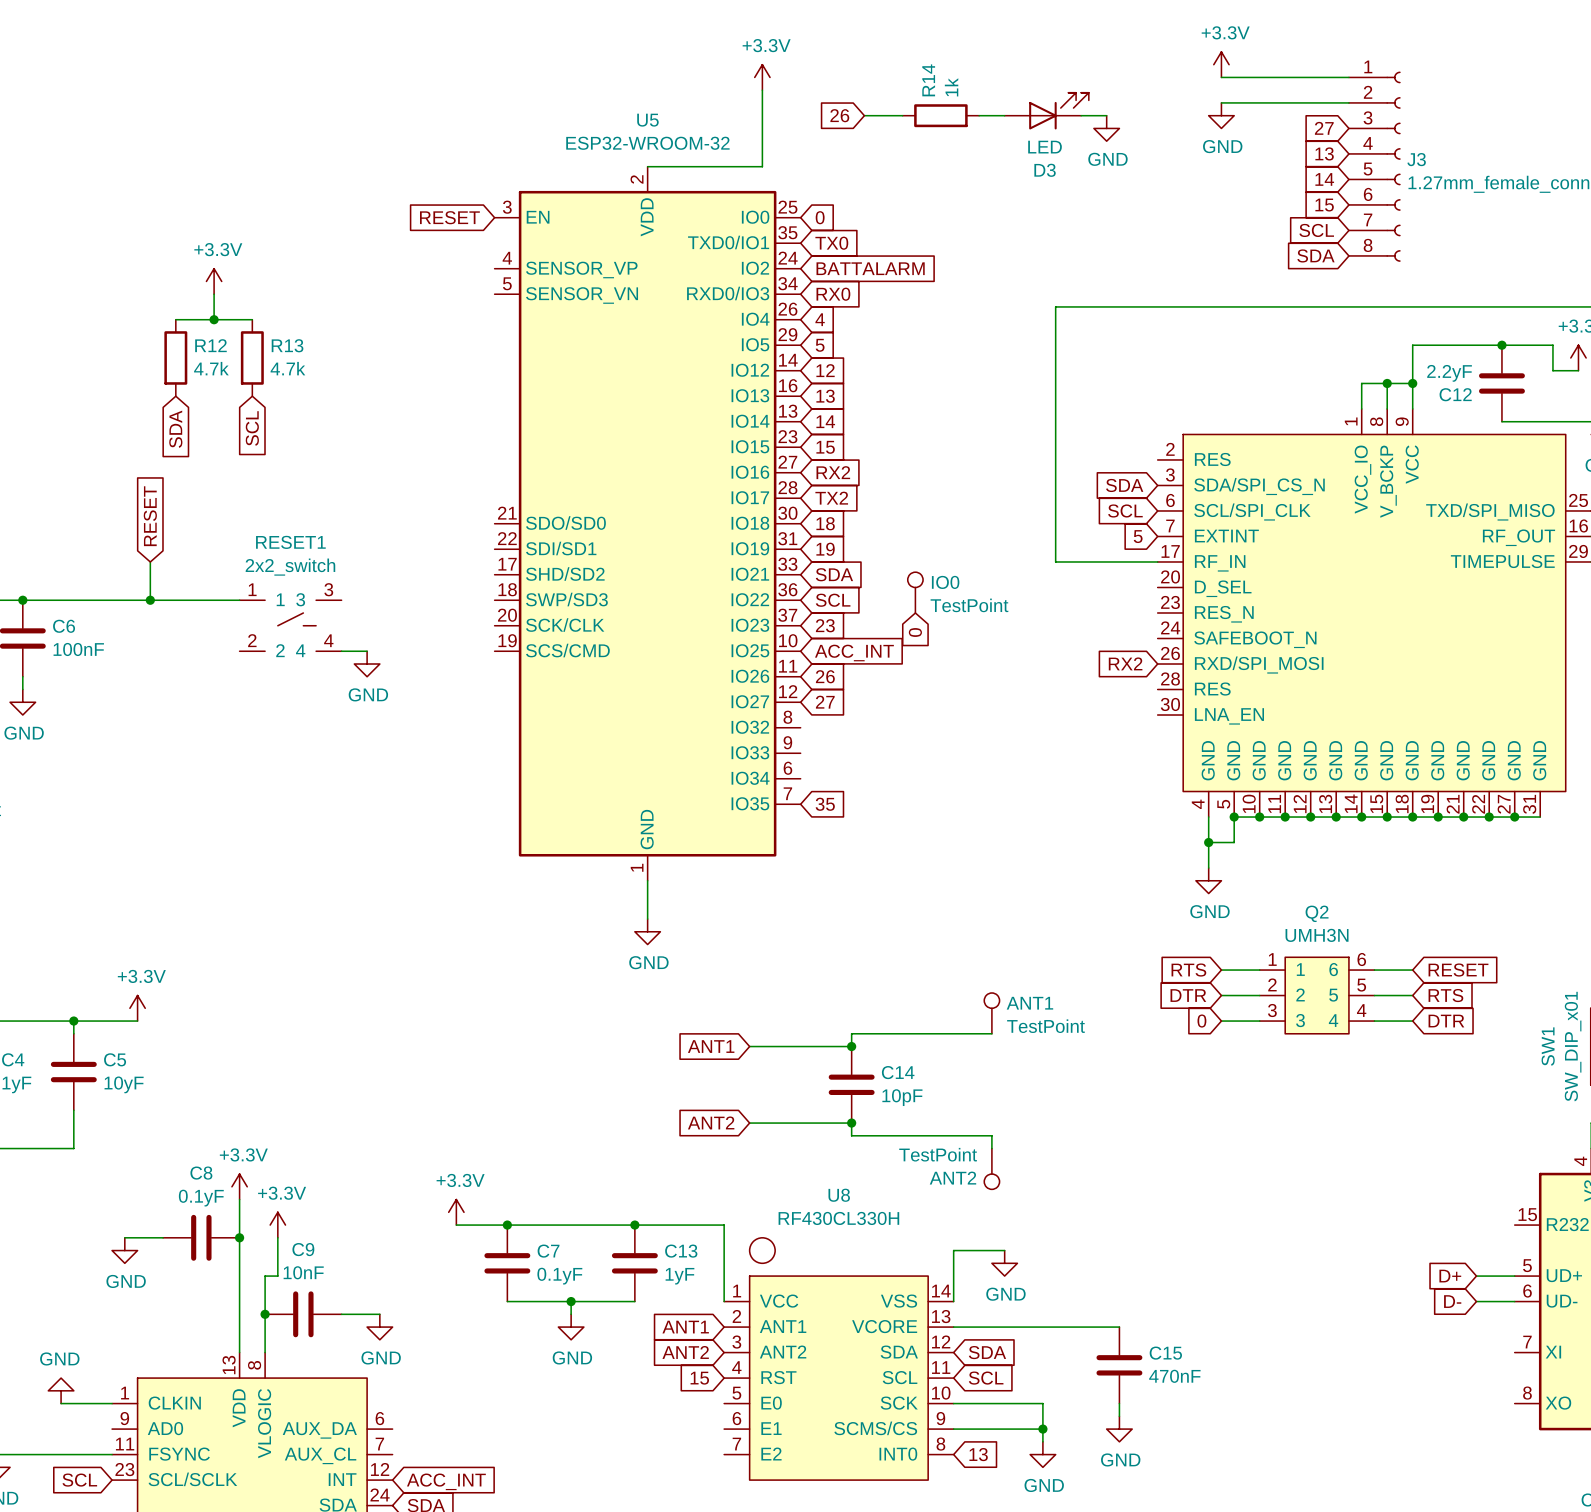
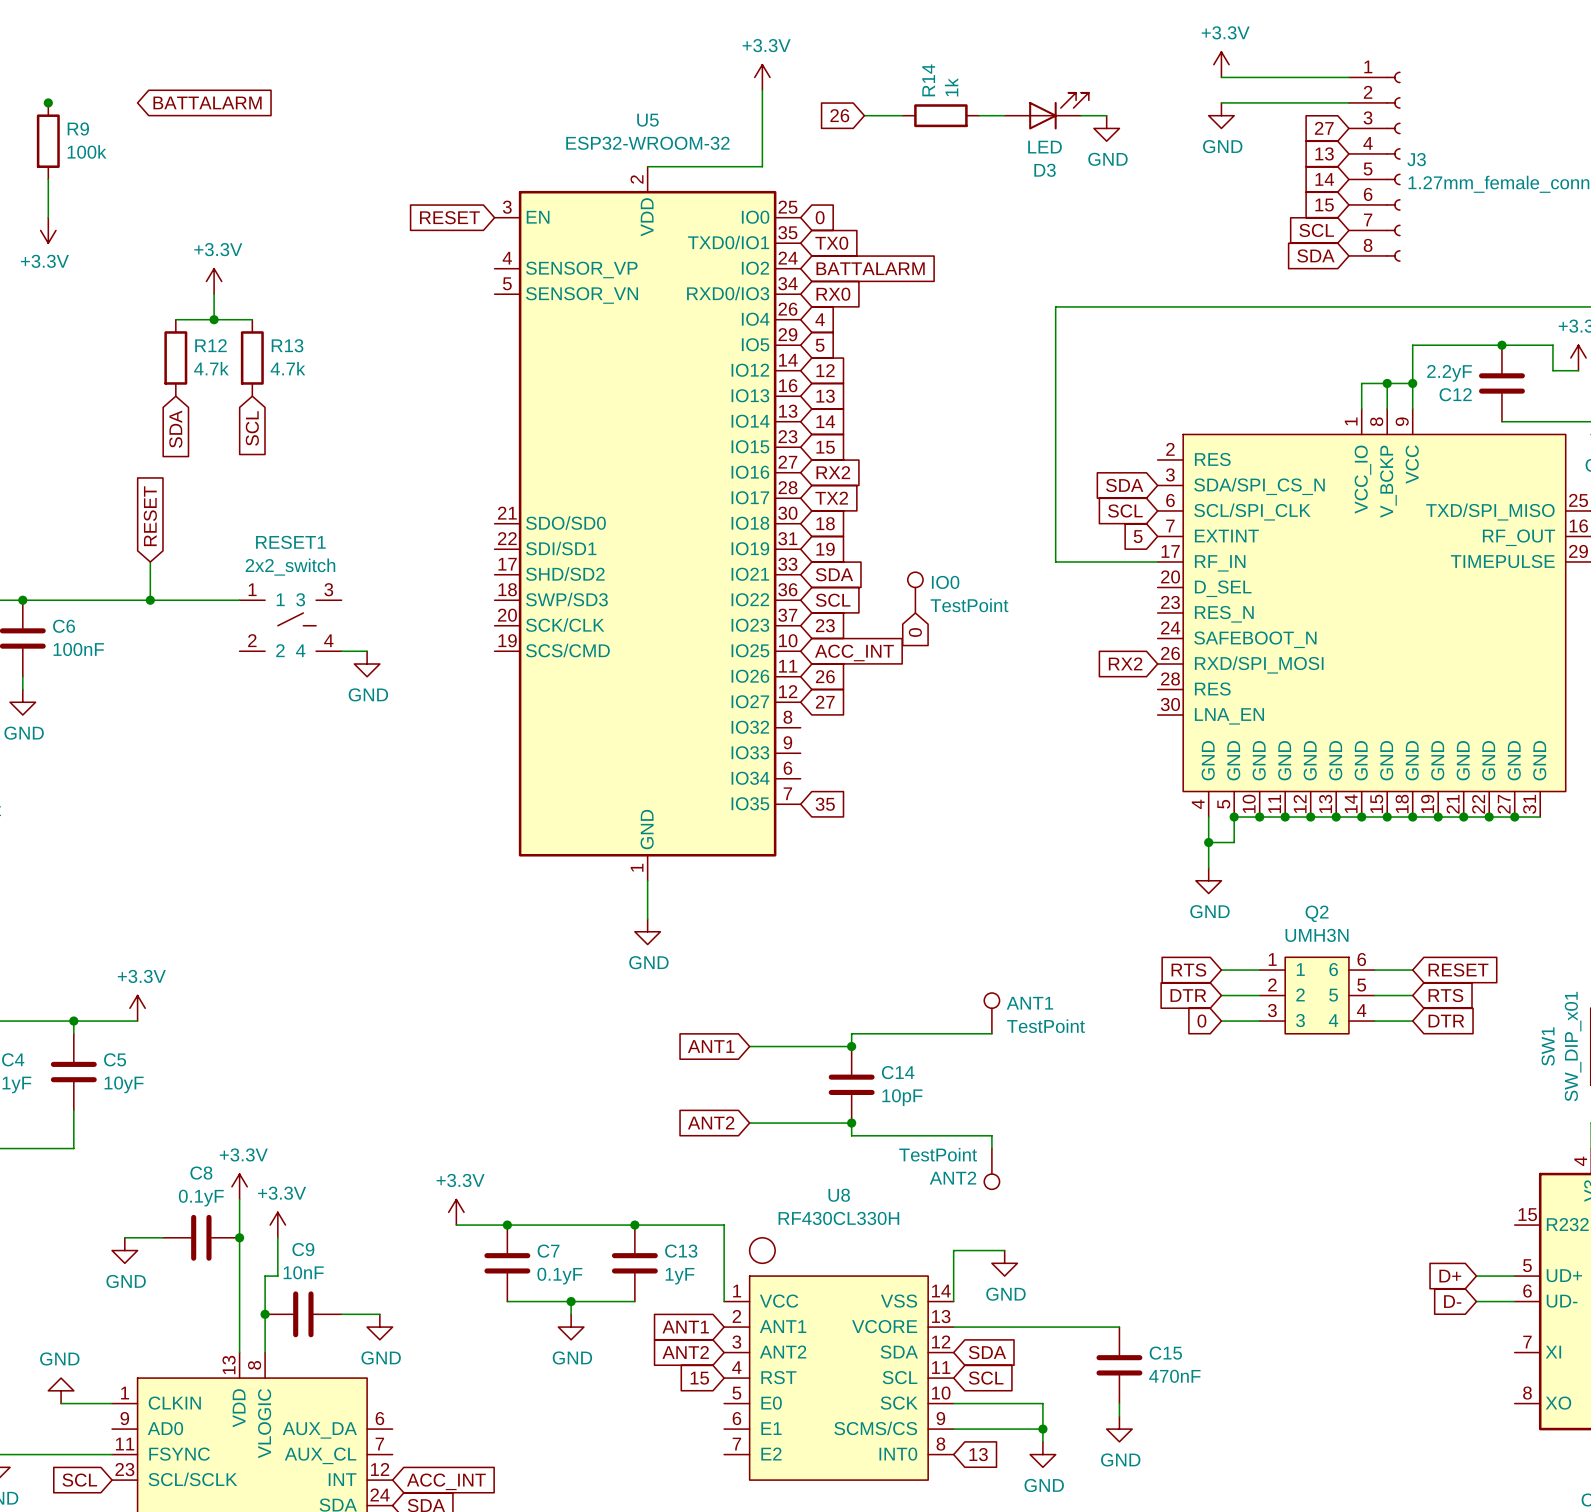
junction: none -> (48, 102)
global label: none -> BATTALARM (207, 102)
R9: none -> 100k (48, 141)
wire: none -> (48, 179) (48, 217)
power symbol: none -> +3.3V (48, 230)

